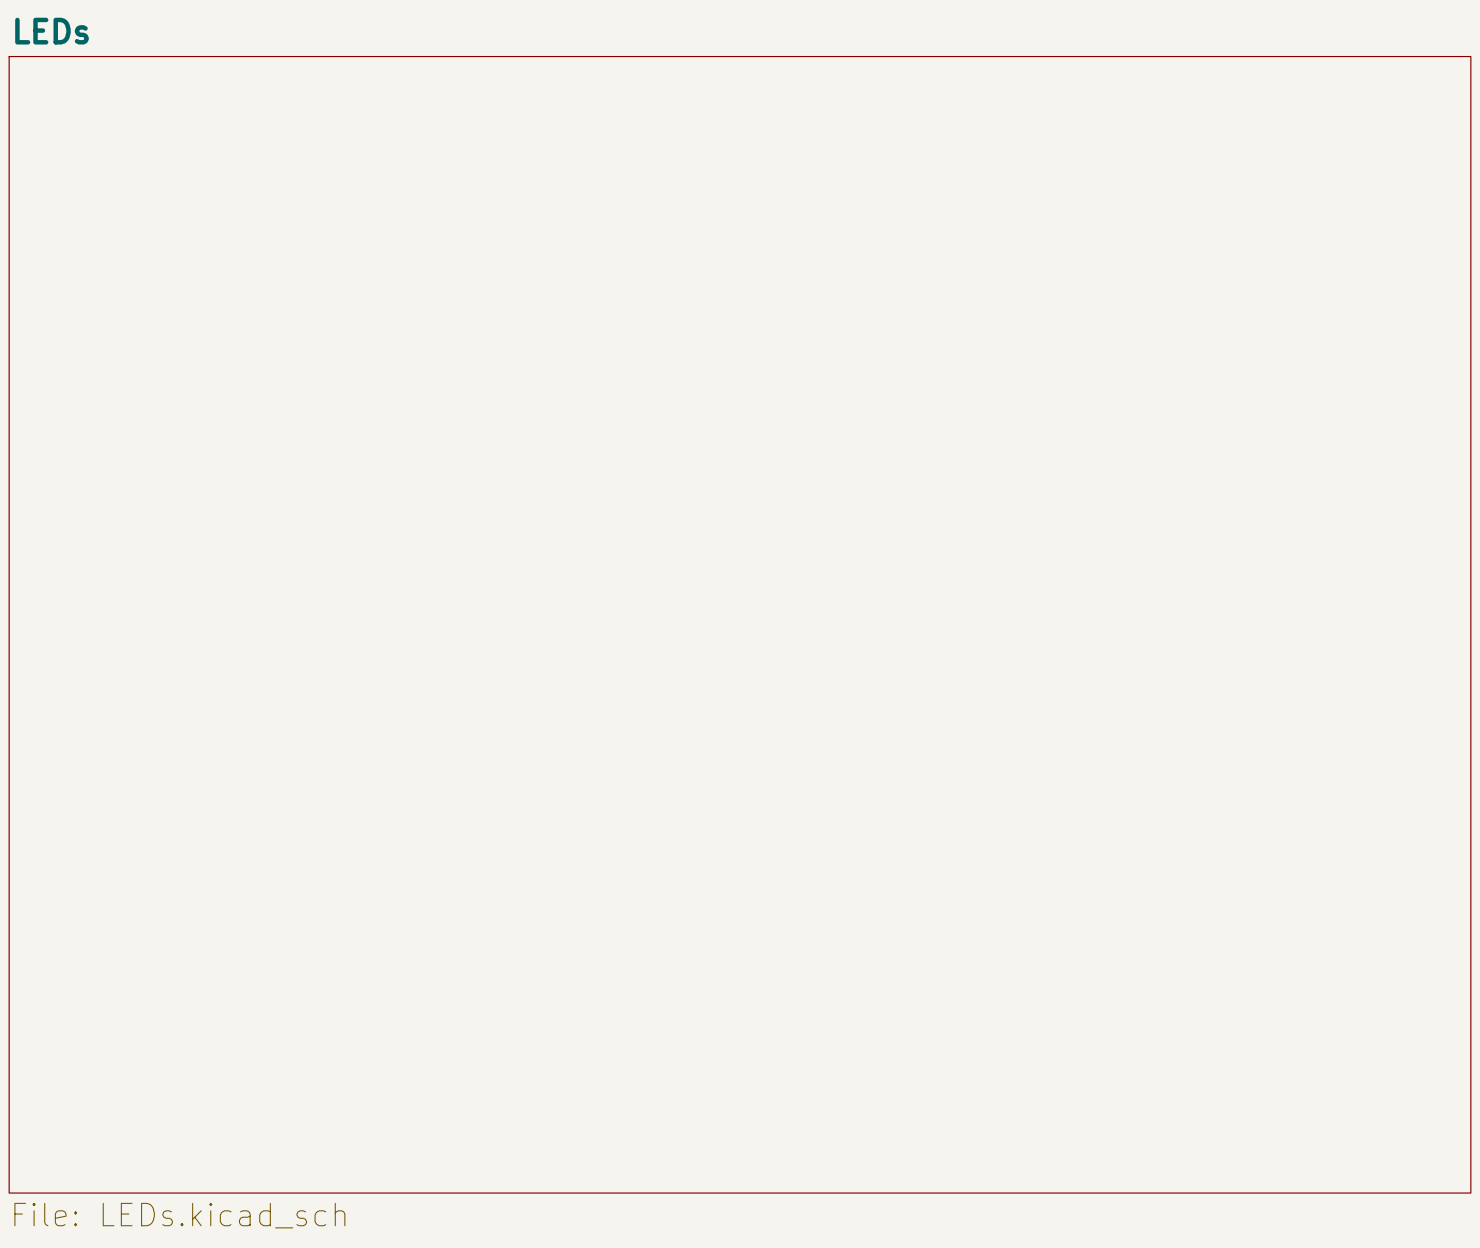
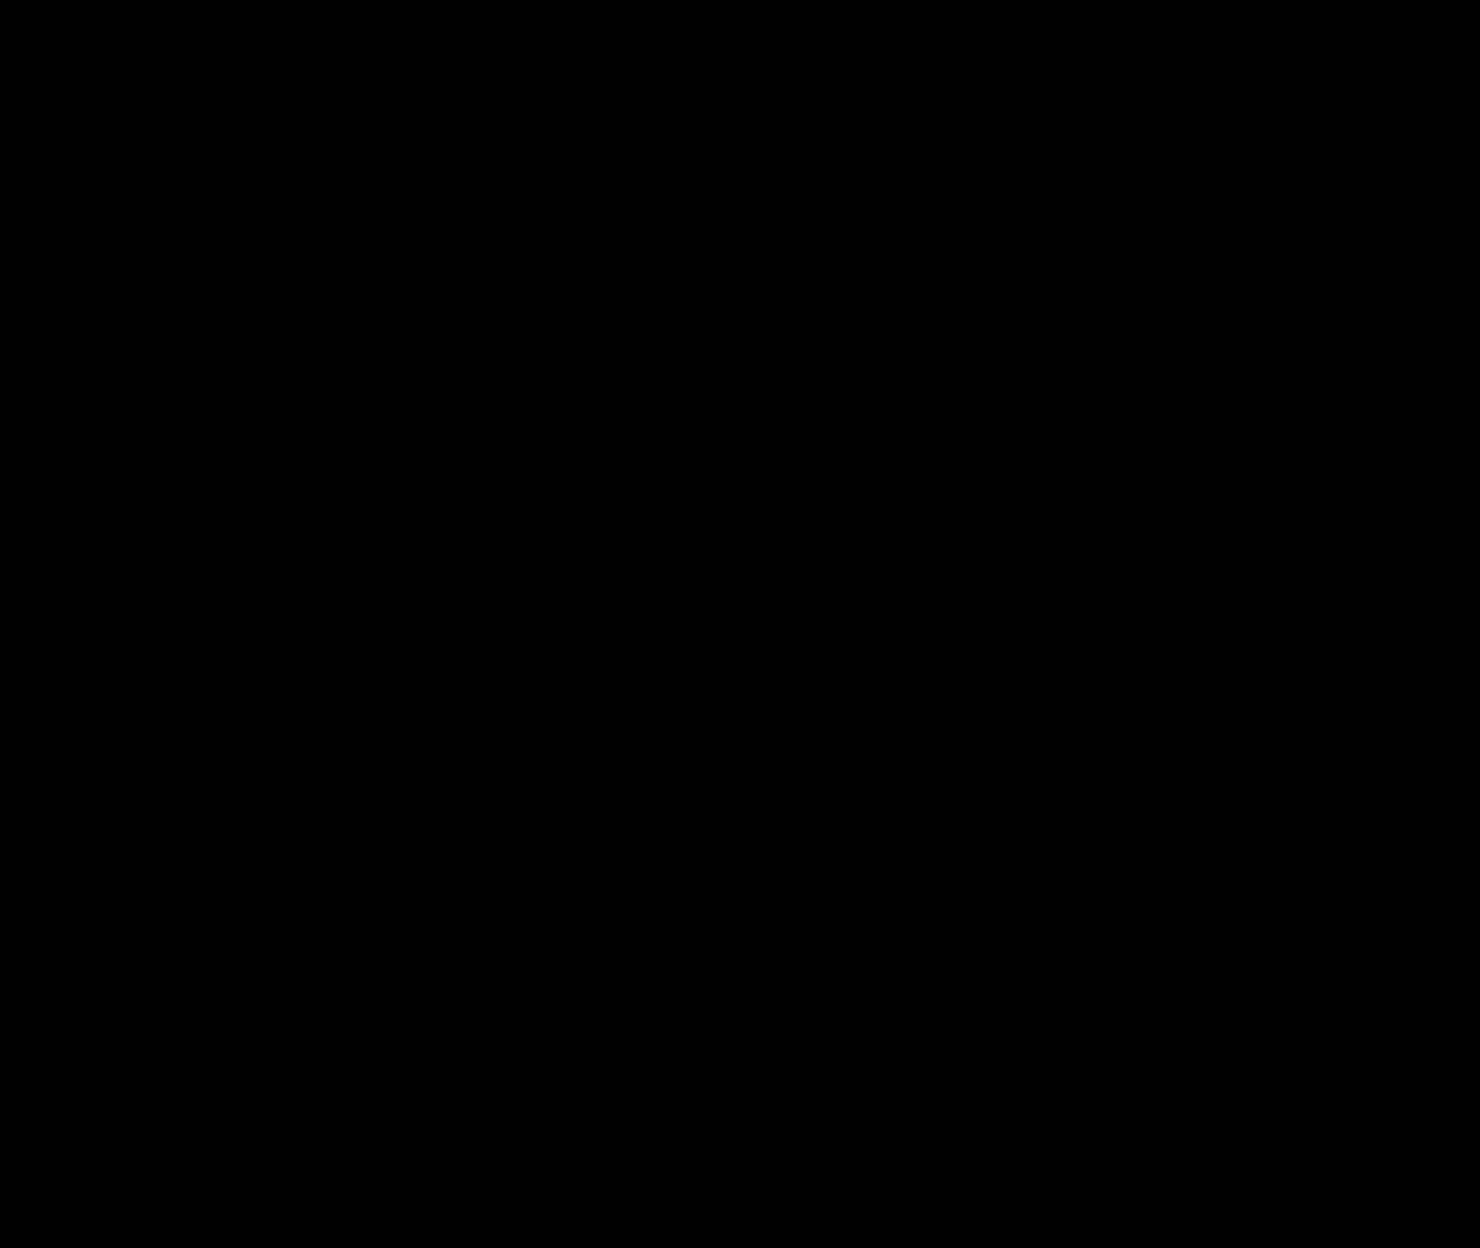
sheet LEDs: File: LEDs.kicad_sch (740, 624) -> none

